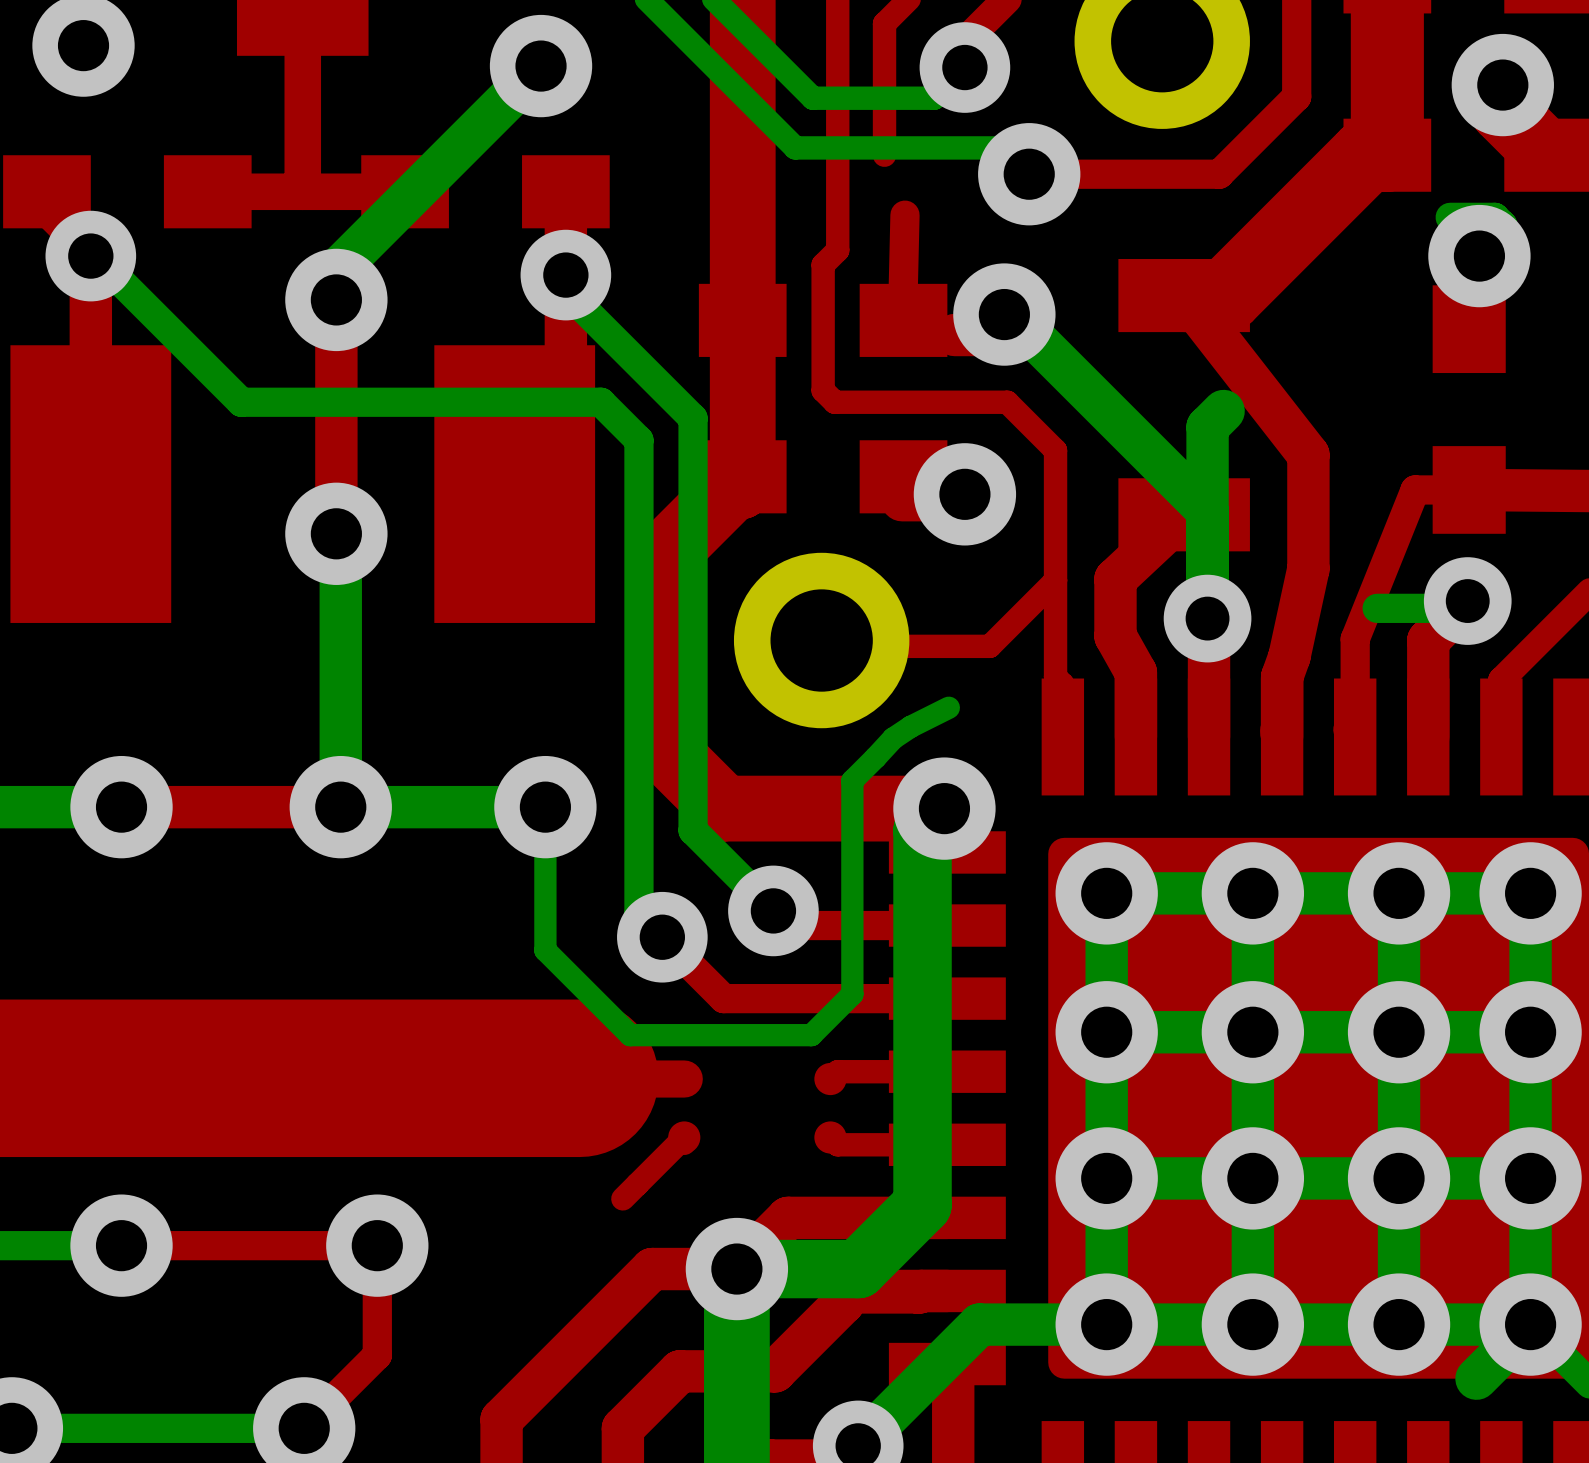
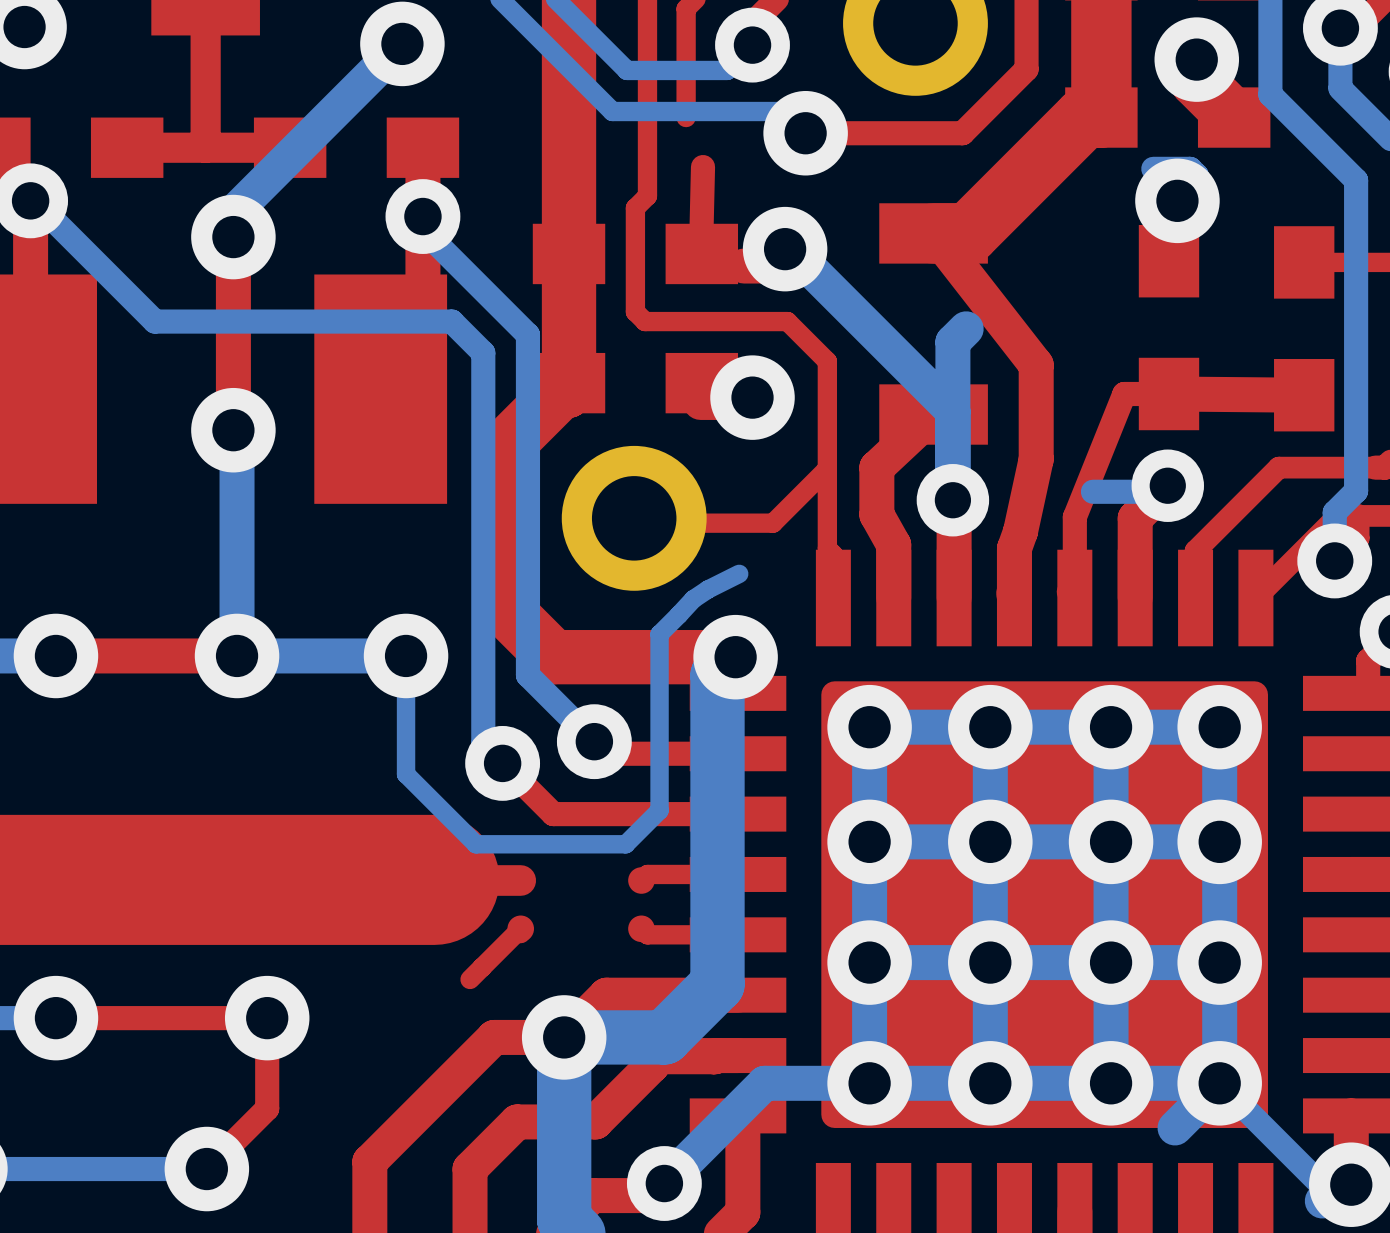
bottom track width: thin (944, 808) (922, 830) (922, 1204) (858, 1269) (736, 1269) -> thick (735, 657) (717, 675) (717, 984) (664, 1037) (564, 1037)

